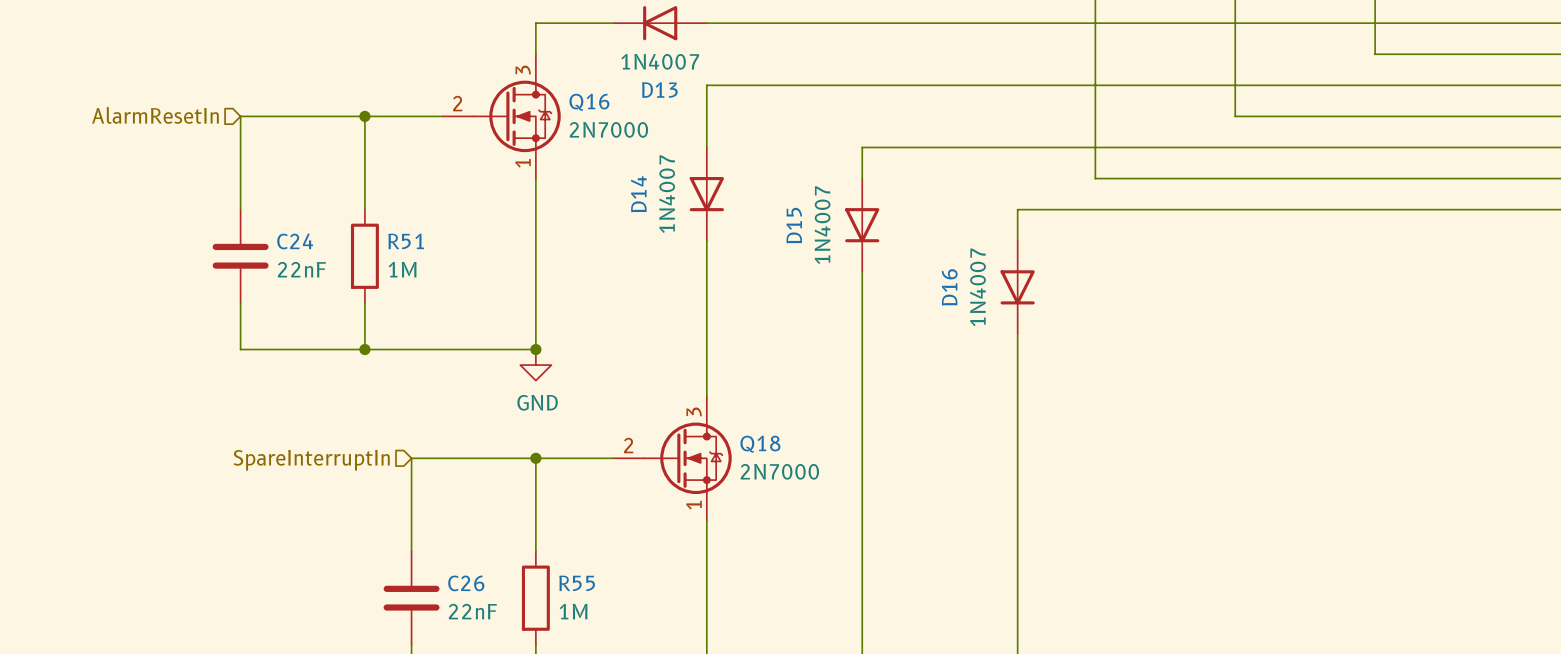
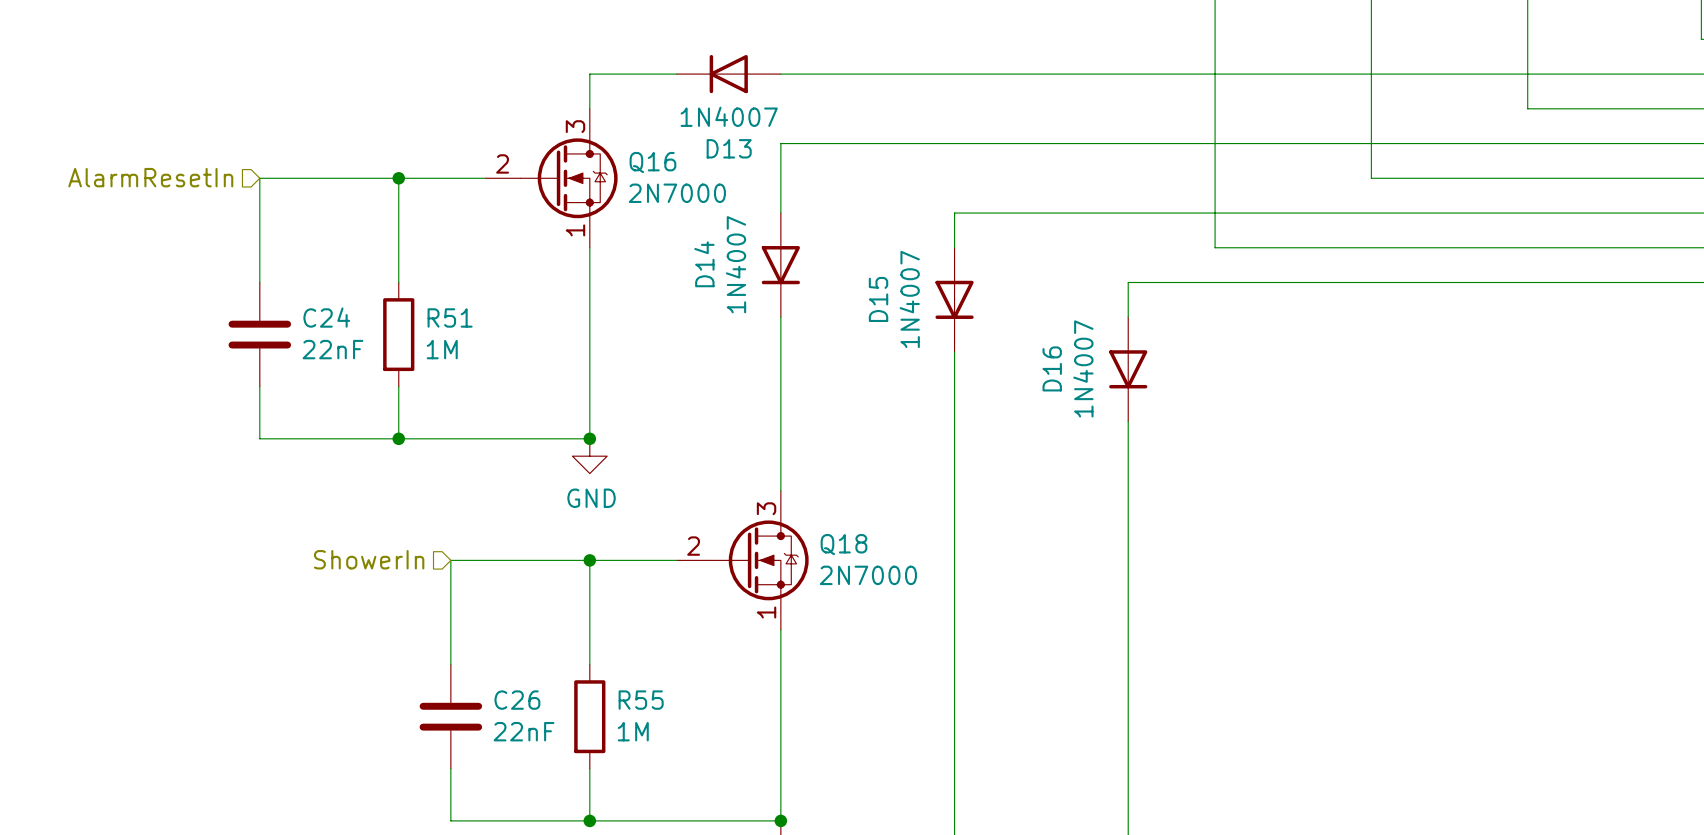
hierarchical label: SpareInterruptIn (311, 460) -> ShowerIn (369, 559)

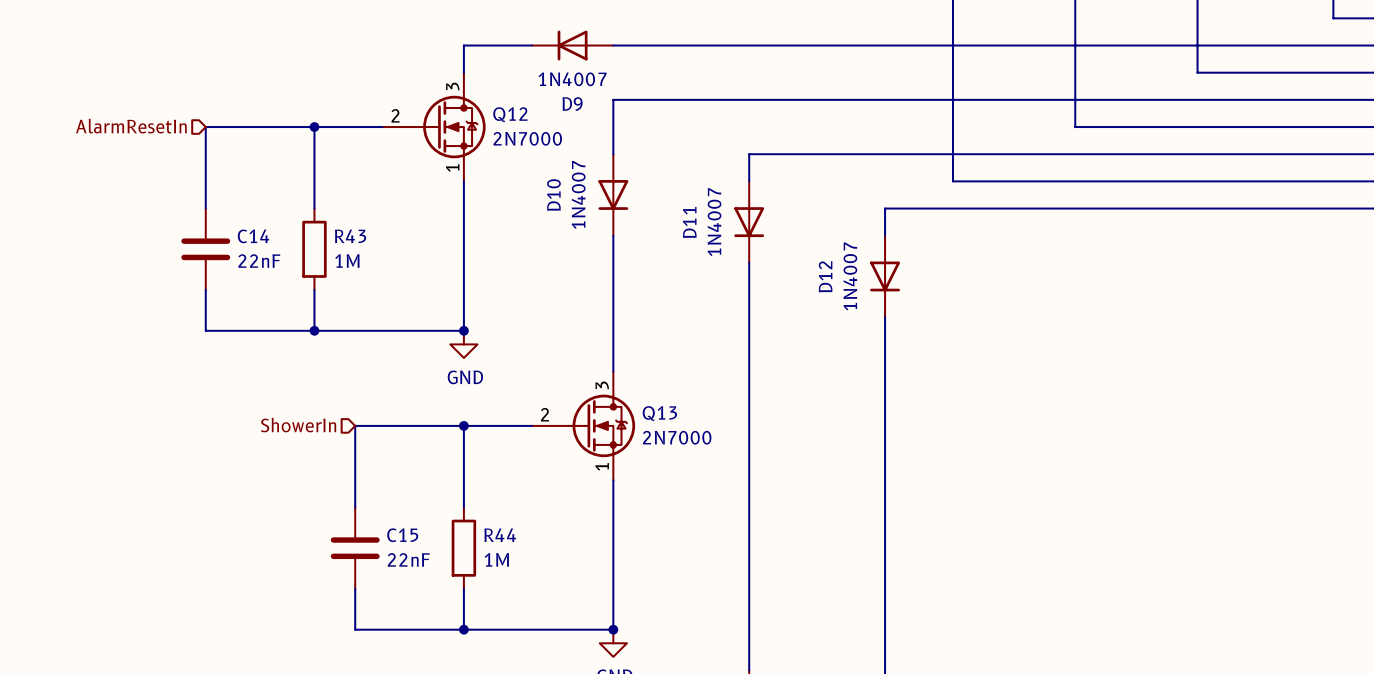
D13 name: D13 (729, 148) -> D9 (572, 104)
Q16 name: Q16 (652, 162) -> Q12 (510, 114)
D14 name: D14 (704, 264) -> D10 (553, 195)
D15 name: D15 (878, 299) -> D11 (689, 222)
C24 name: C24 (326, 317) -> C14 (253, 236)
R51 name: R51 (450, 317) -> R43 (350, 236)
D16 name: D16 (1052, 368) -> D12 (825, 276)
Q18 name: Q18 (844, 544) -> Q13 (659, 413)
C26 name: C26 (517, 700) -> C15 (402, 535)
R55 name: R55 (641, 700) -> R44 (500, 535)

